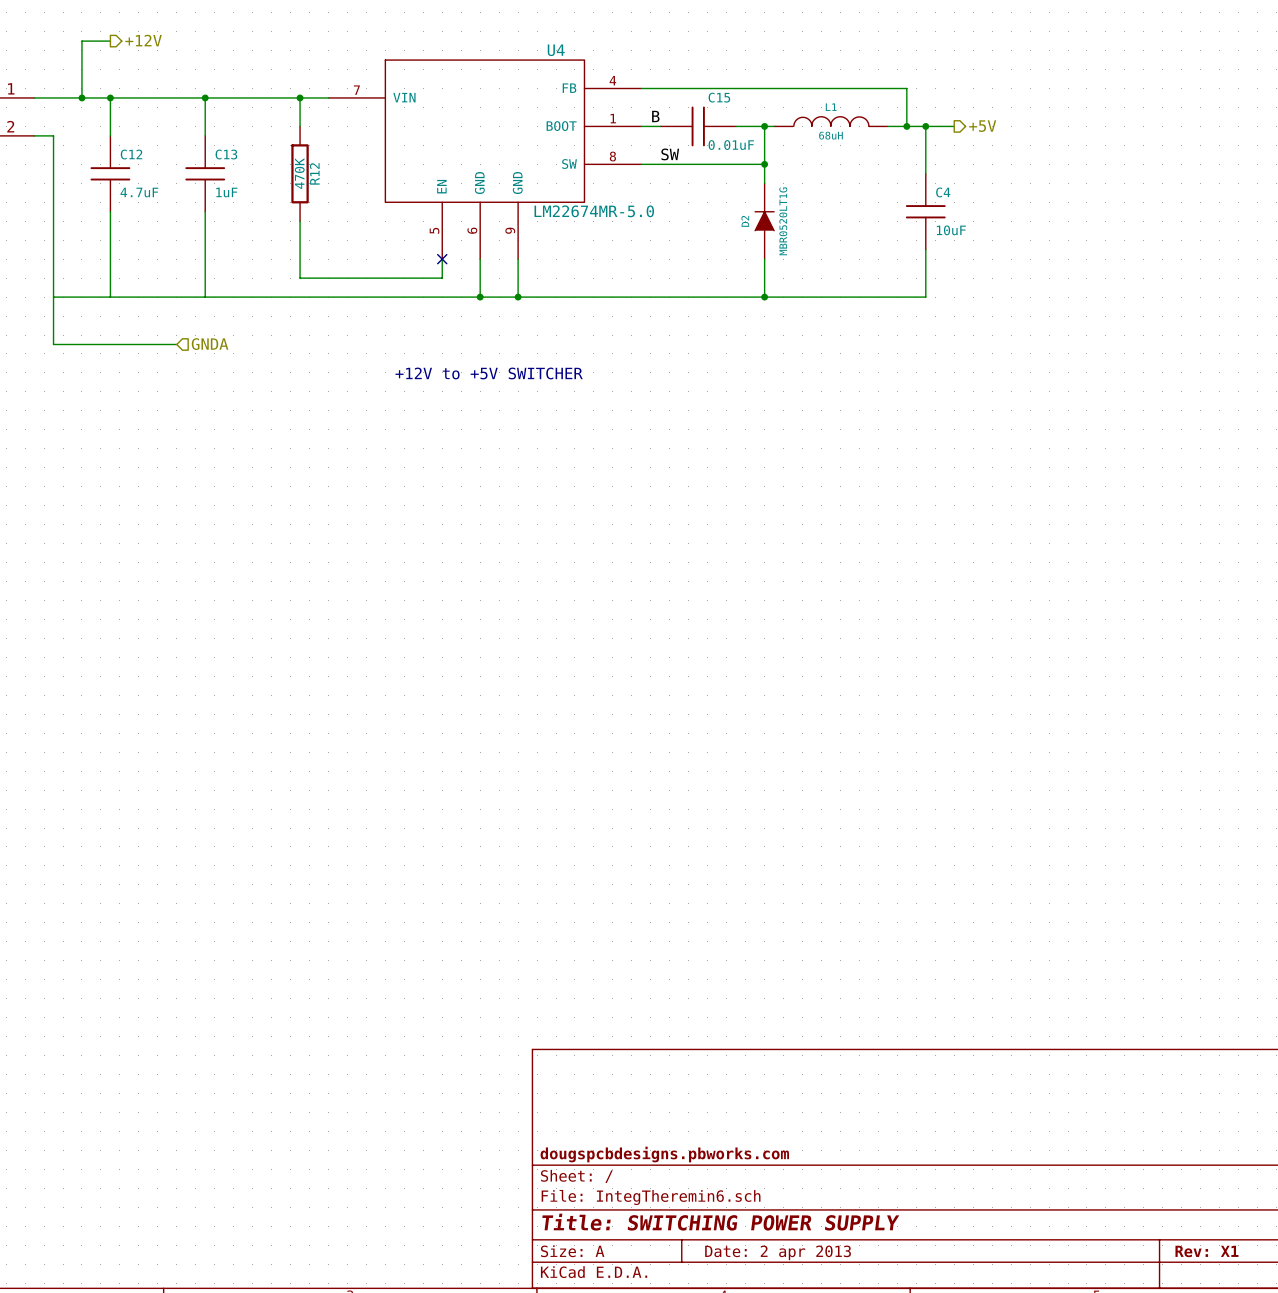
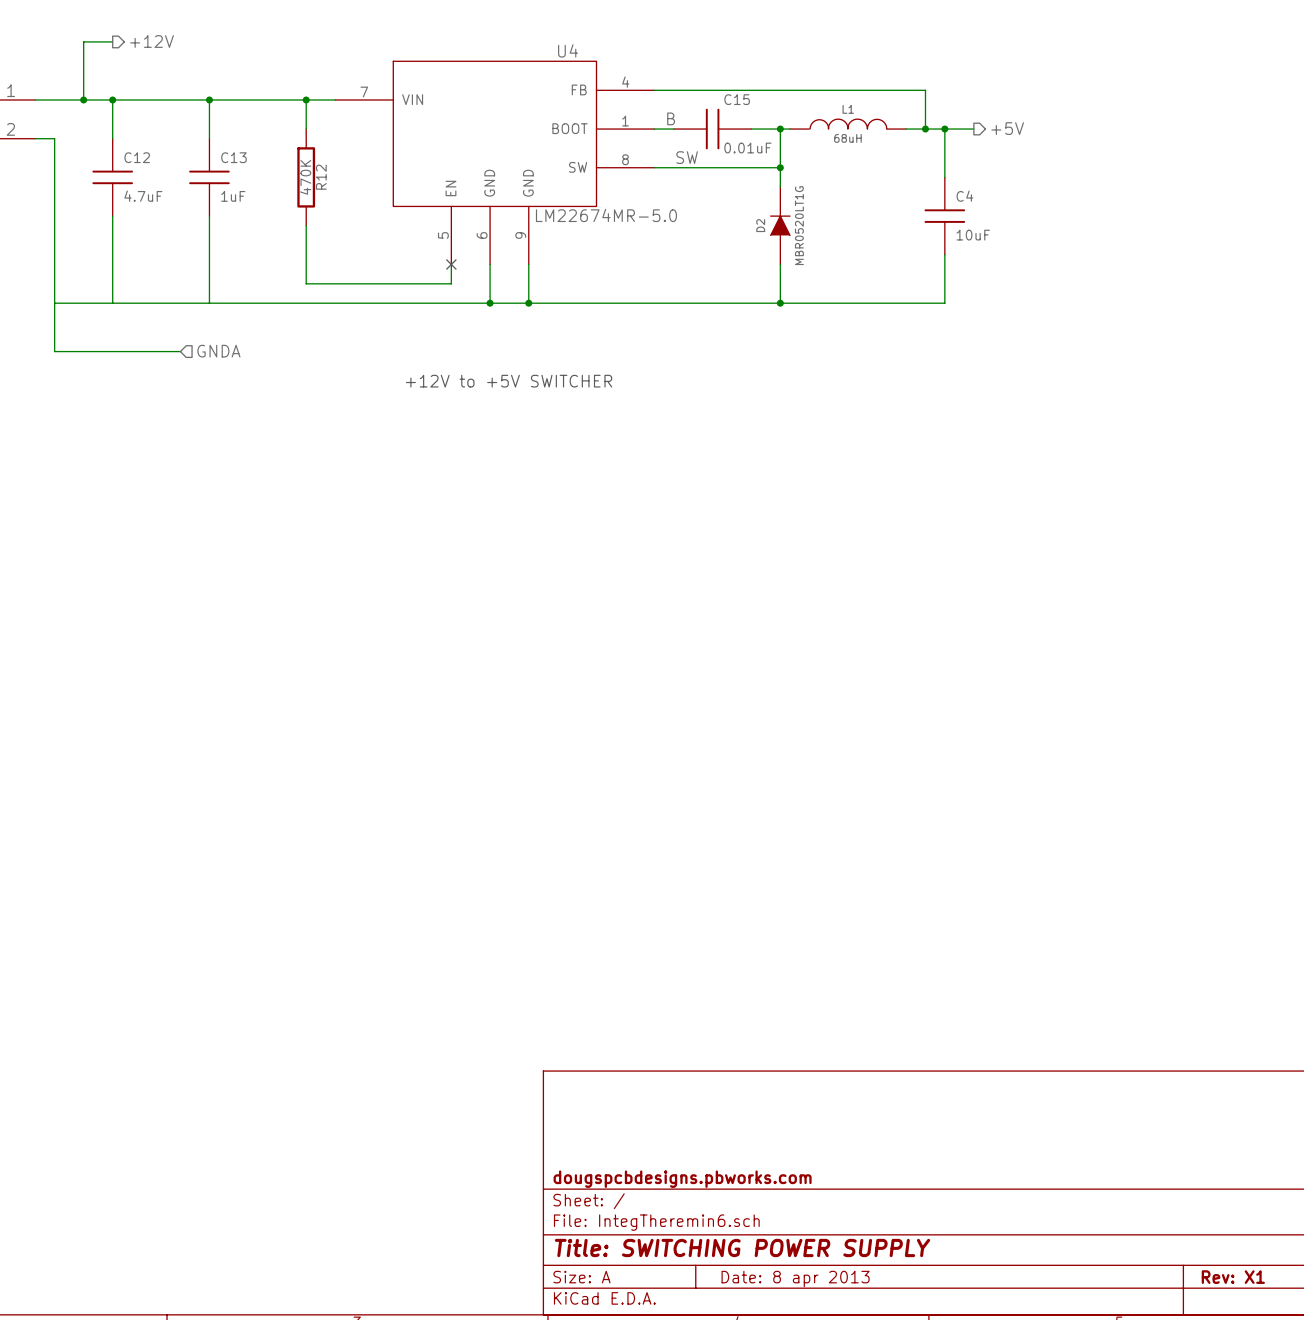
title block: Date: 2 apr 2013 (778, 1252) -> Date: 8 apr 2013 (795, 1278)

